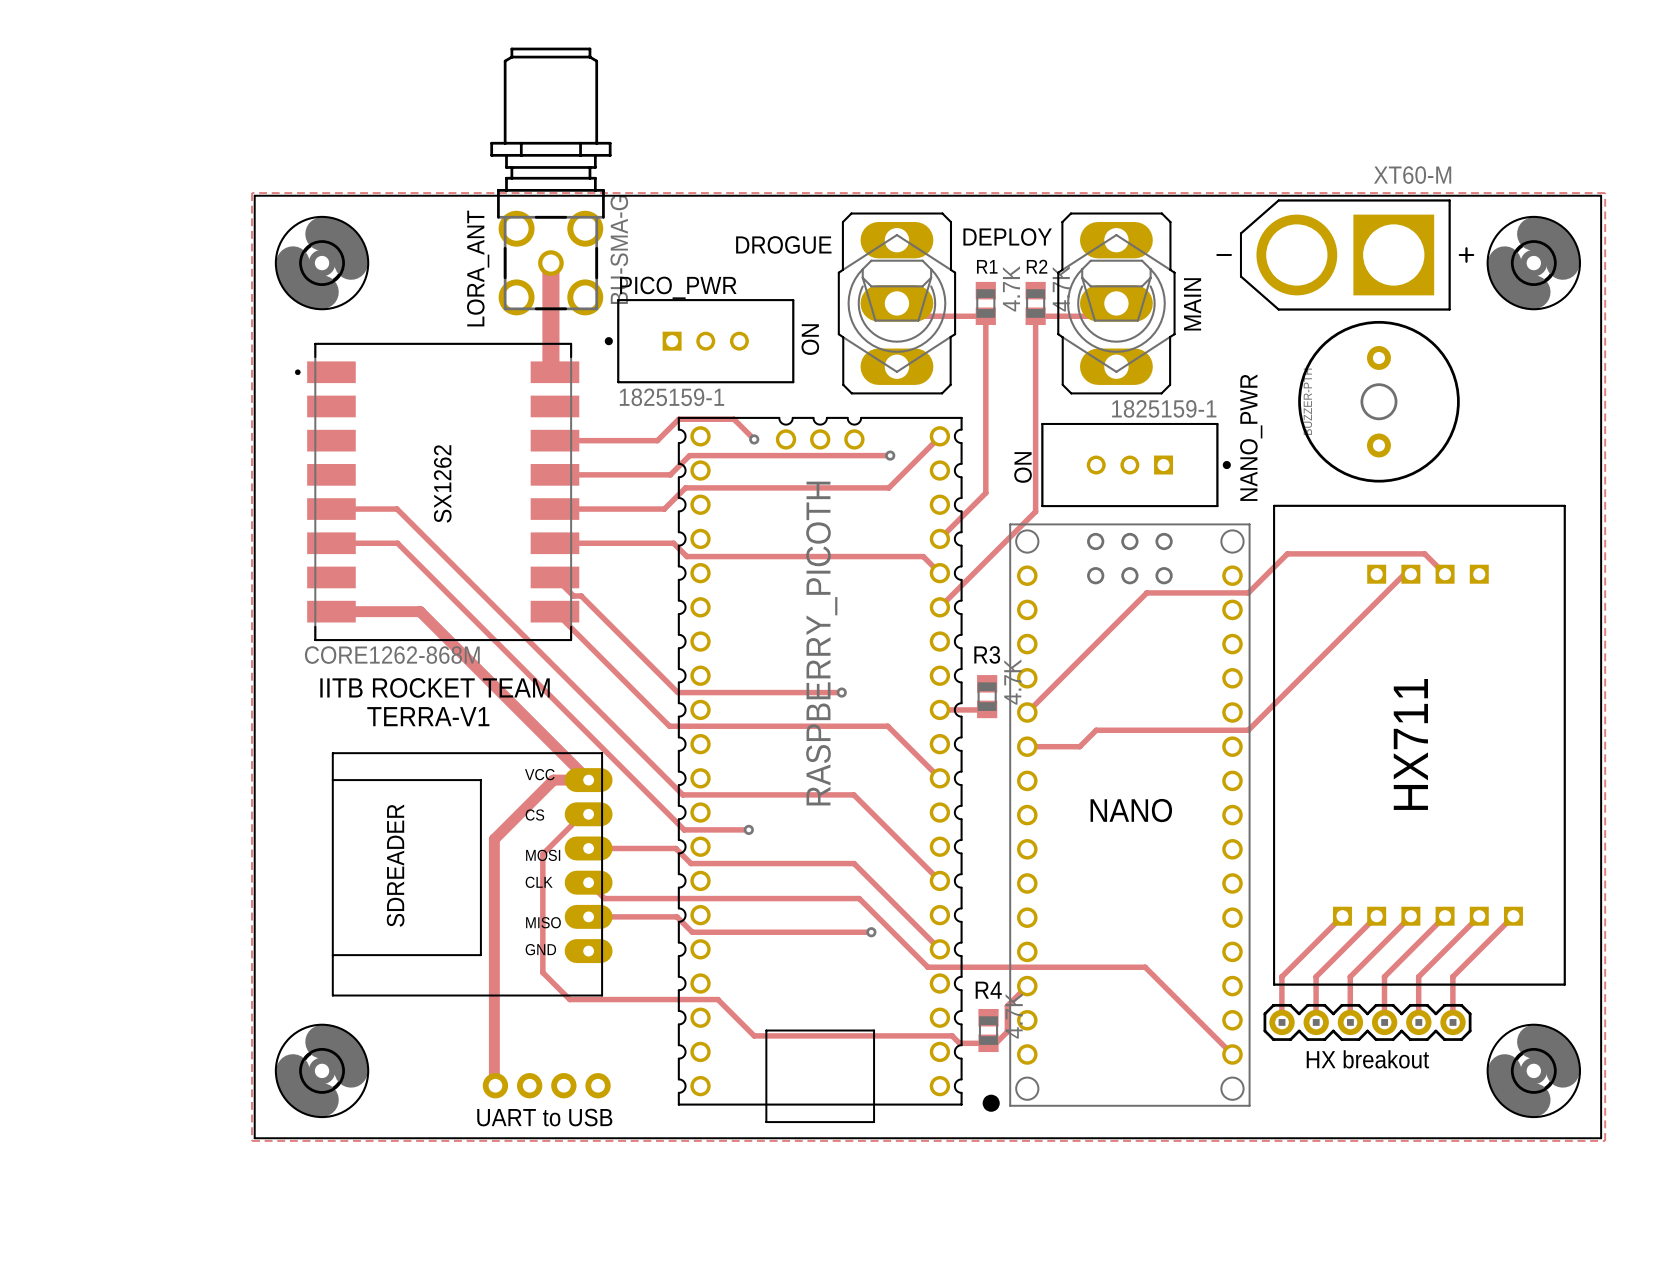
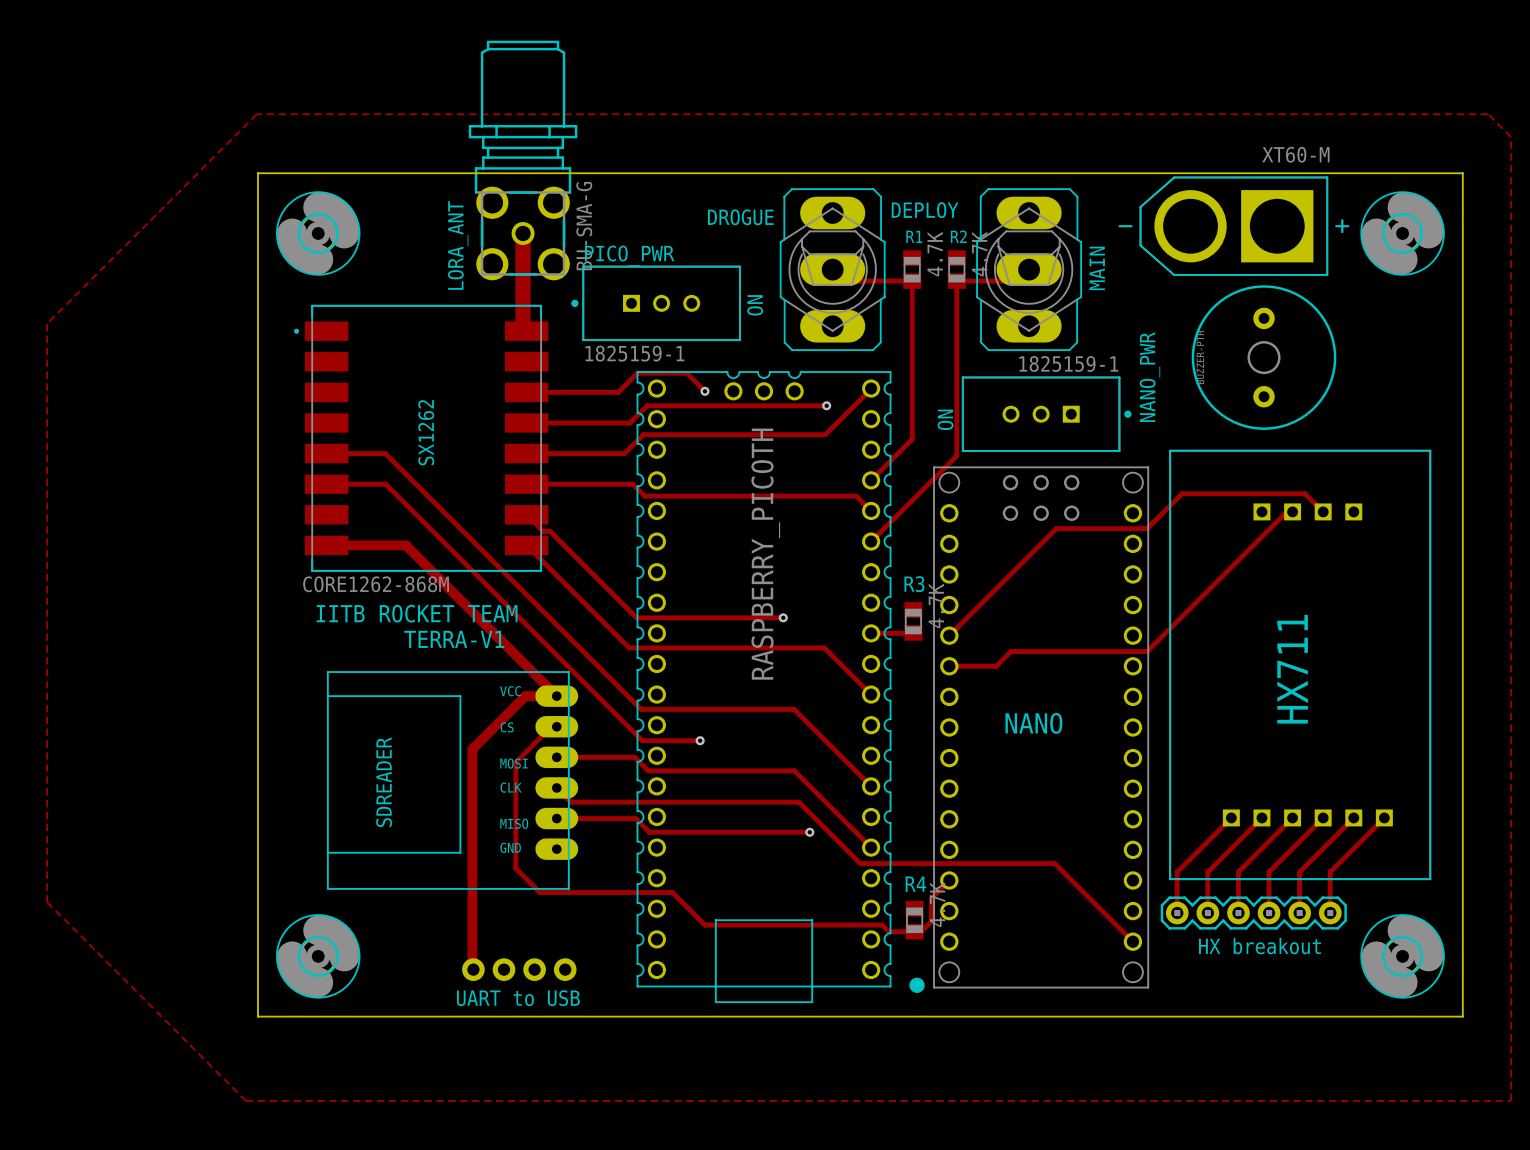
zone outline: (252, 193) (252, 1140) (1605, 1140) (1605, 193) (252, 193) -> (256, 114) (47, 323) (47, 902) (245, 1100) (1511, 1100) (1511, 137) (1488, 114) (256, 114)

